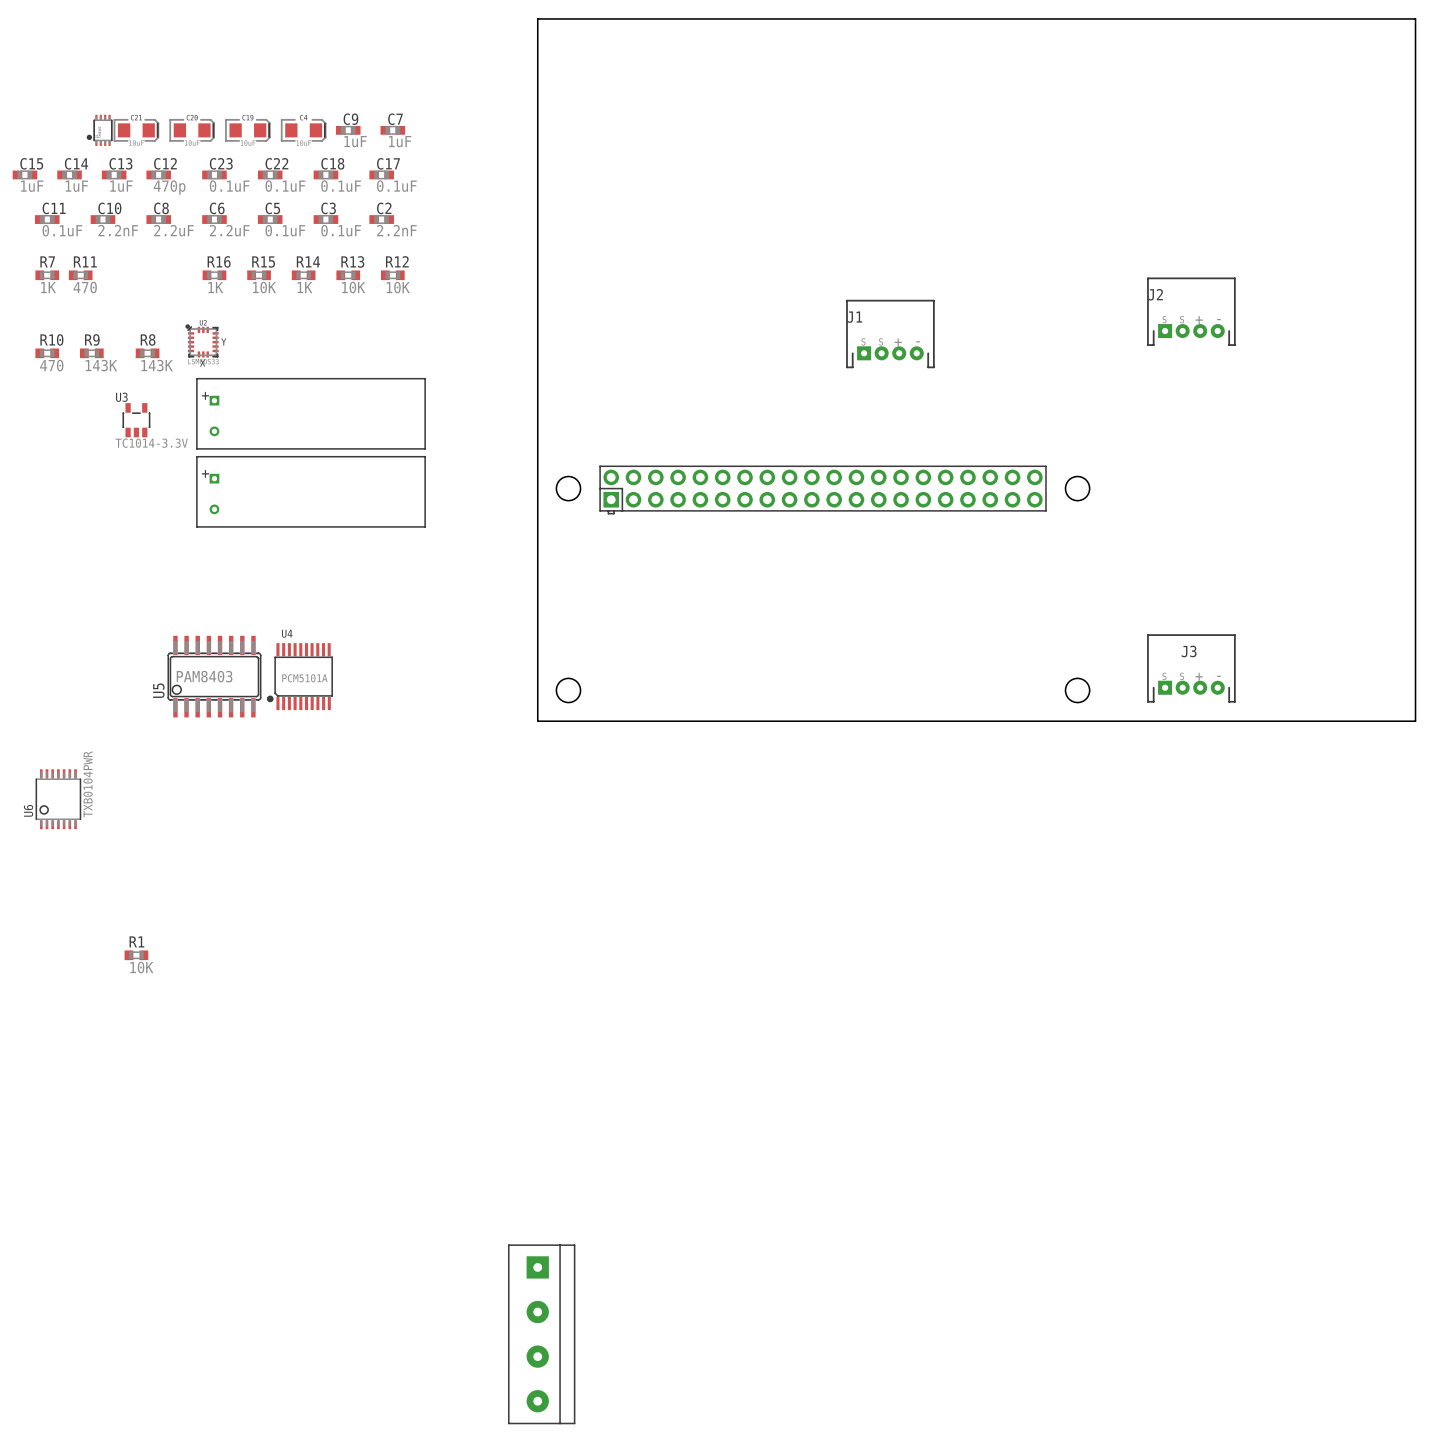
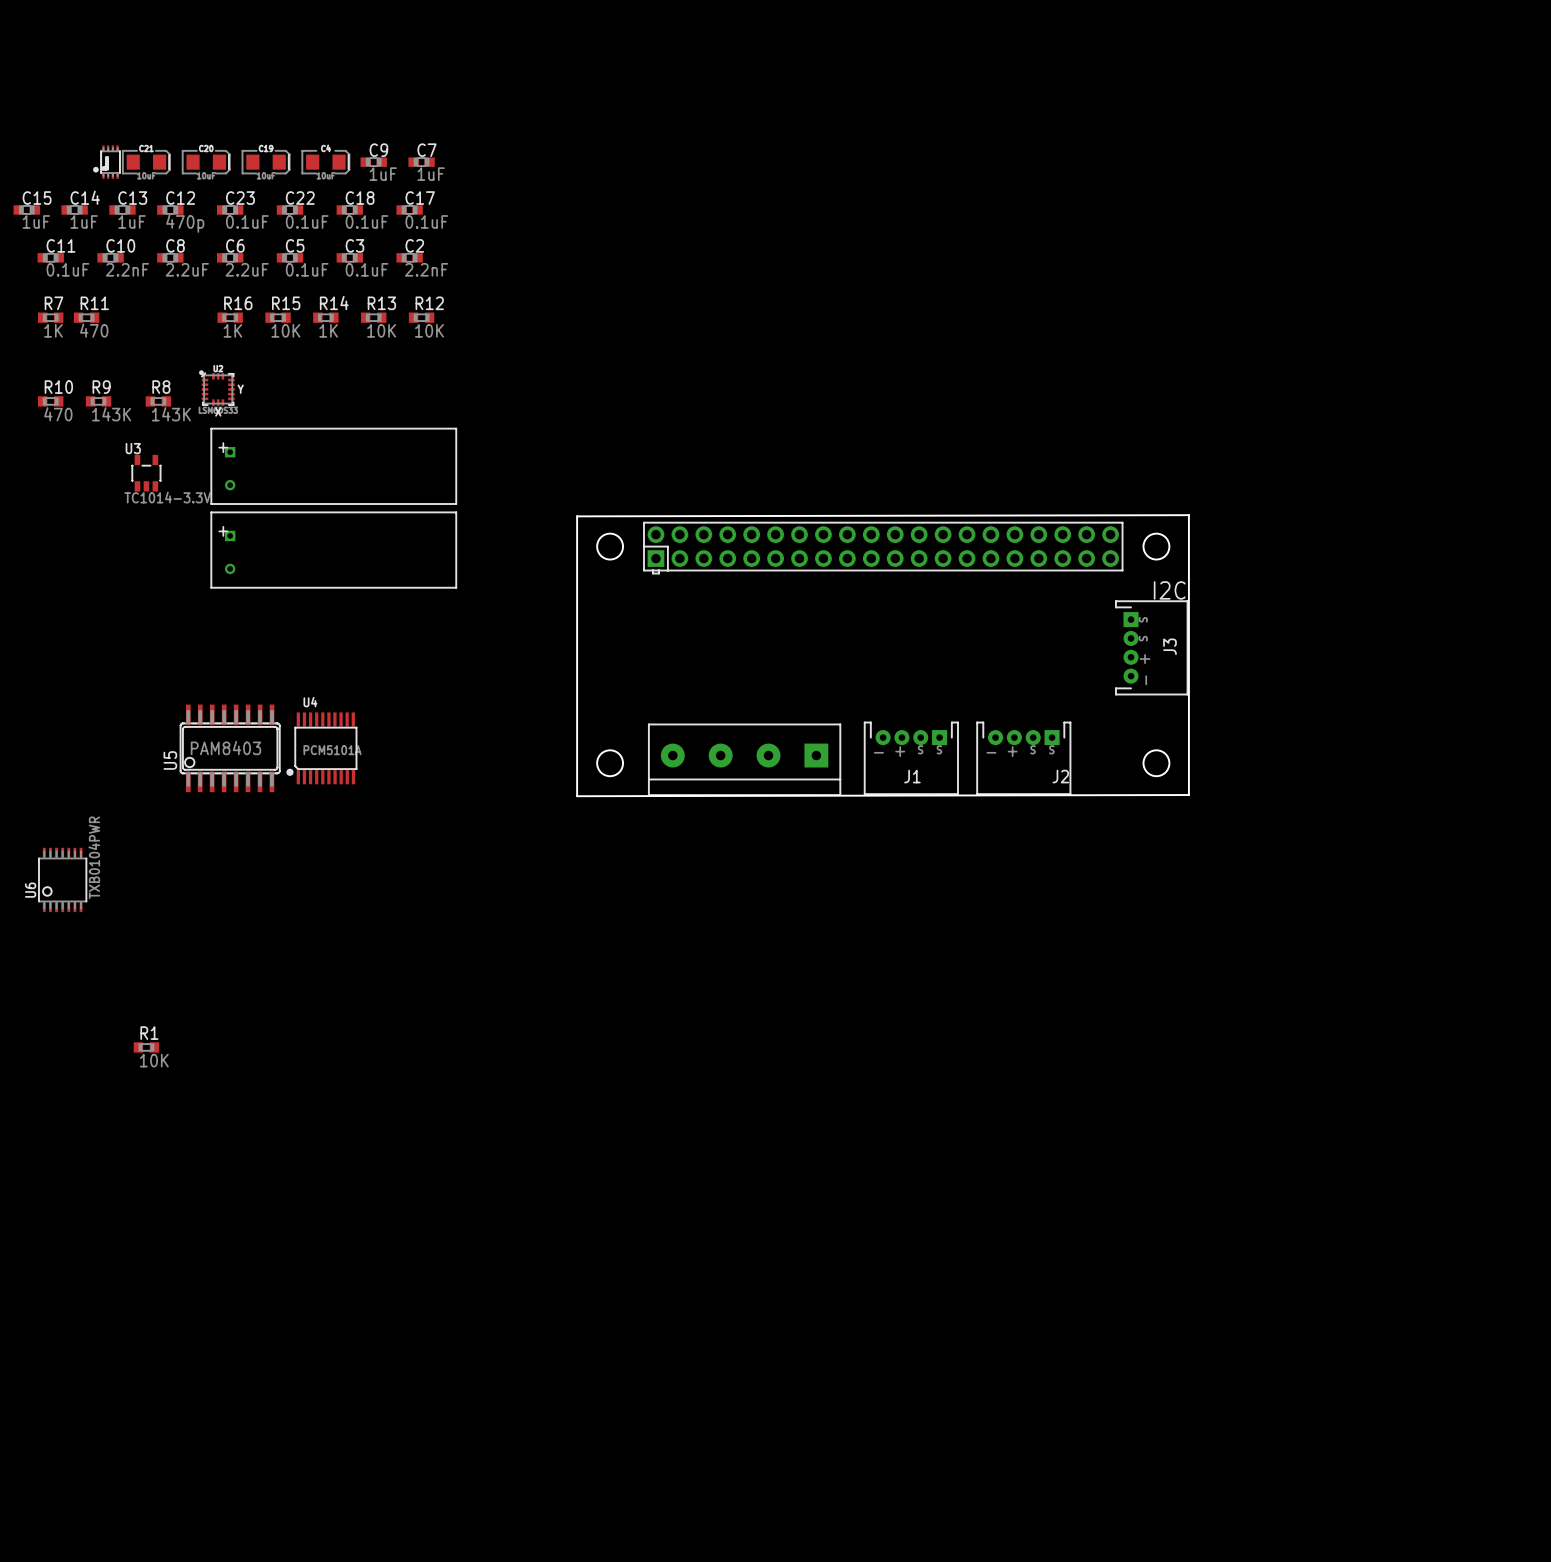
J2 footprint: [1147, 277, 1236, 346] -> [976, 721, 1072, 796]
J2 name position: J2 (1155, 294) -> J2 (1060, 776)
J1 footprint: [846, 299, 935, 369] -> [863, 721, 959, 796]
J1 name position: J1 (854, 317) -> J1 (912, 776)
board edge: (537, 460) (537, 18) (1415, 18) (1415, 721) (537, 721) -> (577, 516) (1188, 515) (1188, 795) (577, 796)
text: none -> I2C (1169, 590)
J3 footprint: [1147, 634, 1236, 703] -> [1114, 600, 1189, 696]
J3 name position: J3 (1189, 651) -> J3 (1169, 646)
part: none -> (744, 759)
part: (541, 1334) -> none

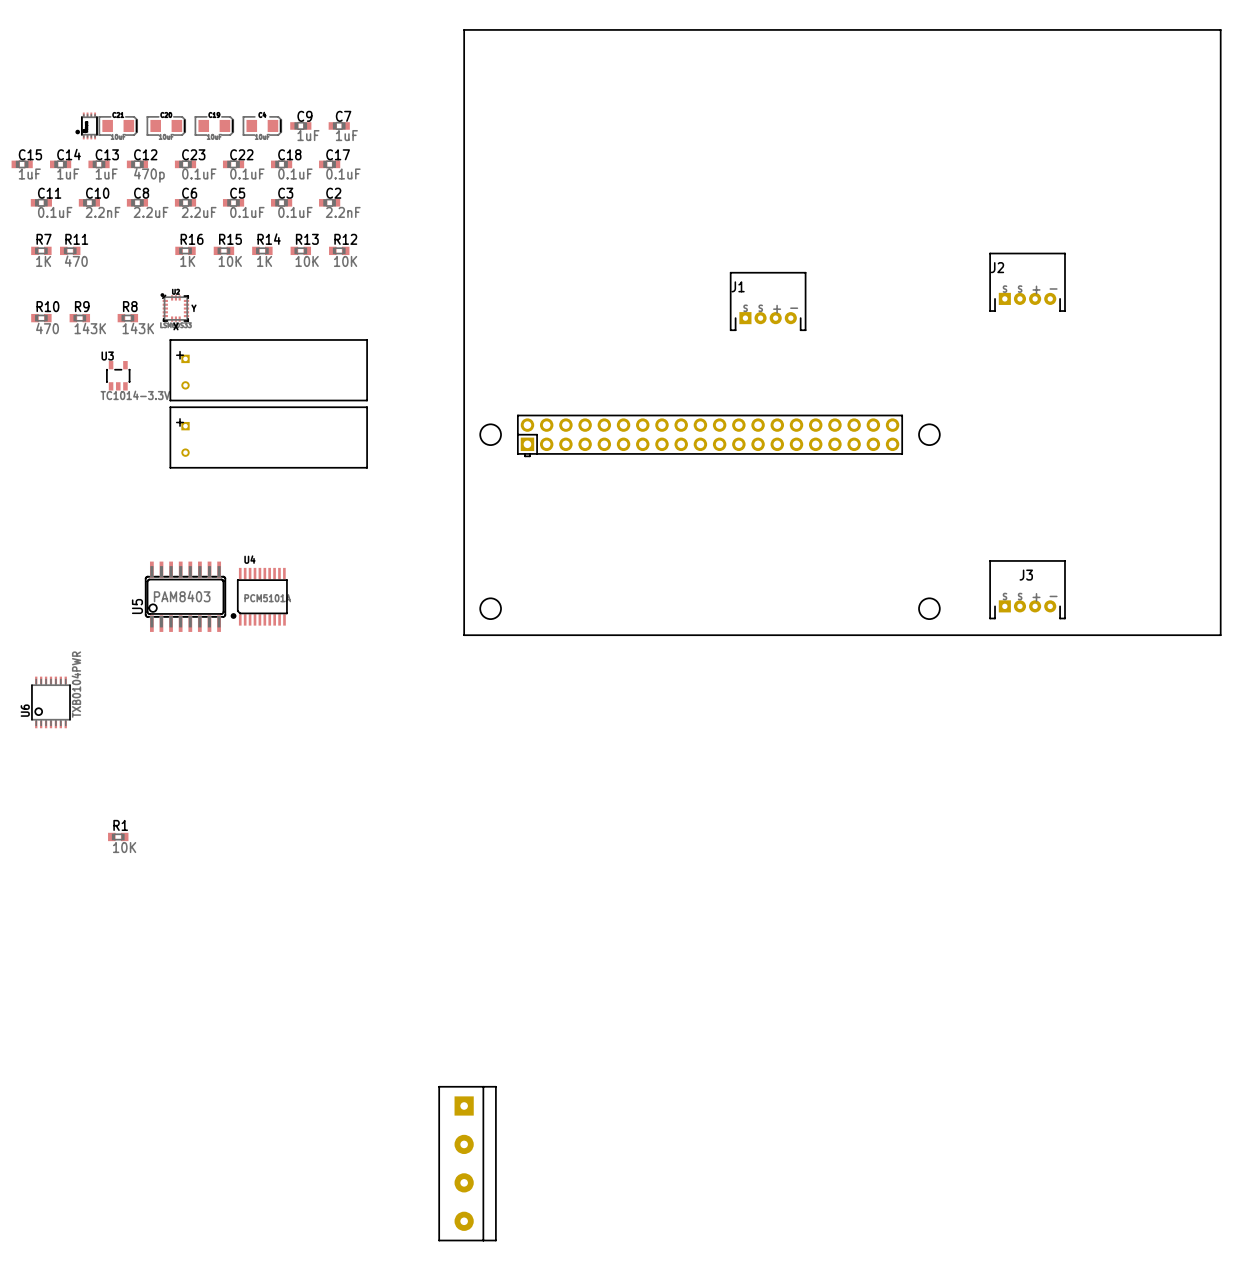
board edge: (577, 516) (1188, 515) (1188, 795) (577, 796) -> (464, 410) (464, 29) (1220, 29) (1220, 635) (464, 635)
text: I2C (1169, 590) -> none
J3 footprint: [1114, 600, 1189, 696] -> [989, 560, 1066, 620]
J3 name position: J3 (1169, 646) -> J3 (1026, 575)
J1 footprint: [863, 721, 959, 796] -> [729, 271, 807, 332]
J2 footprint: [976, 721, 1072, 796] -> [989, 252, 1066, 312]
part: (744, 759) -> none
J1 name position: J1 (912, 776) -> J1 (738, 286)
J2 name position: J2 (1060, 776) -> J2 (997, 267)
part: none -> (467, 1163)

